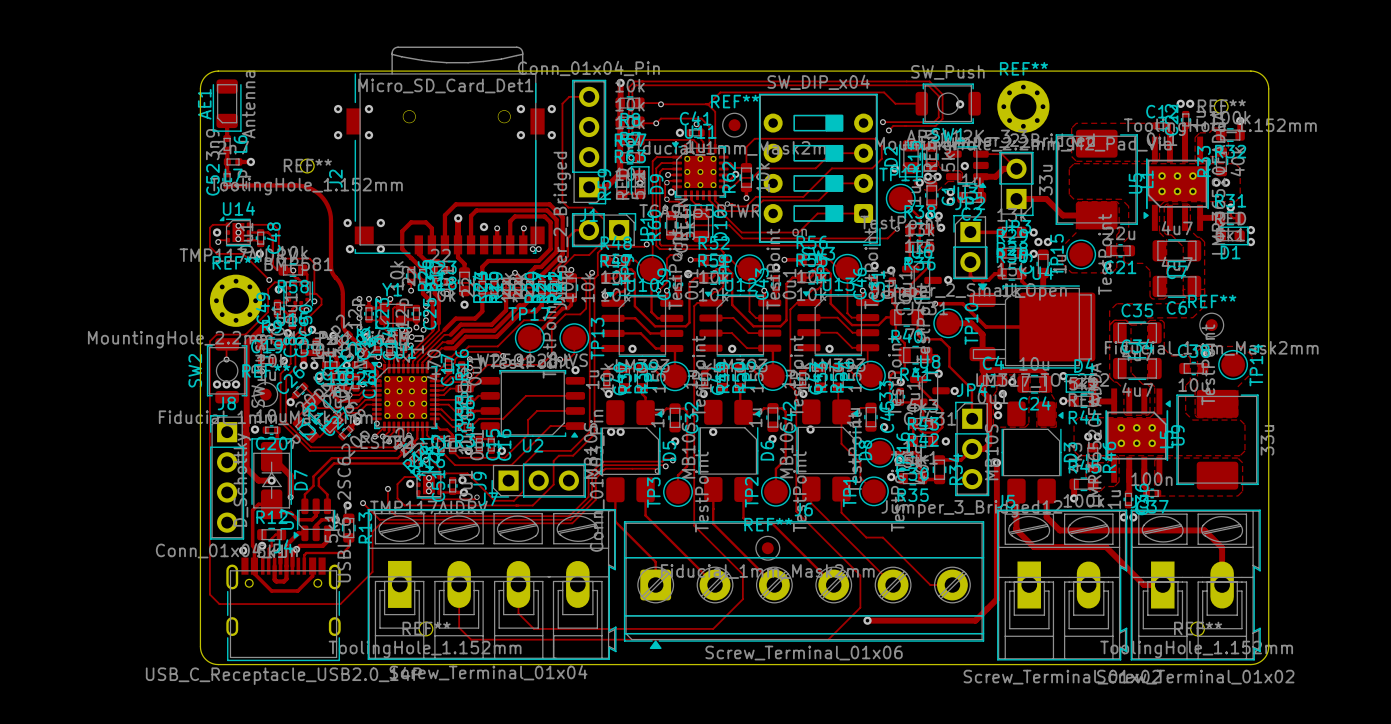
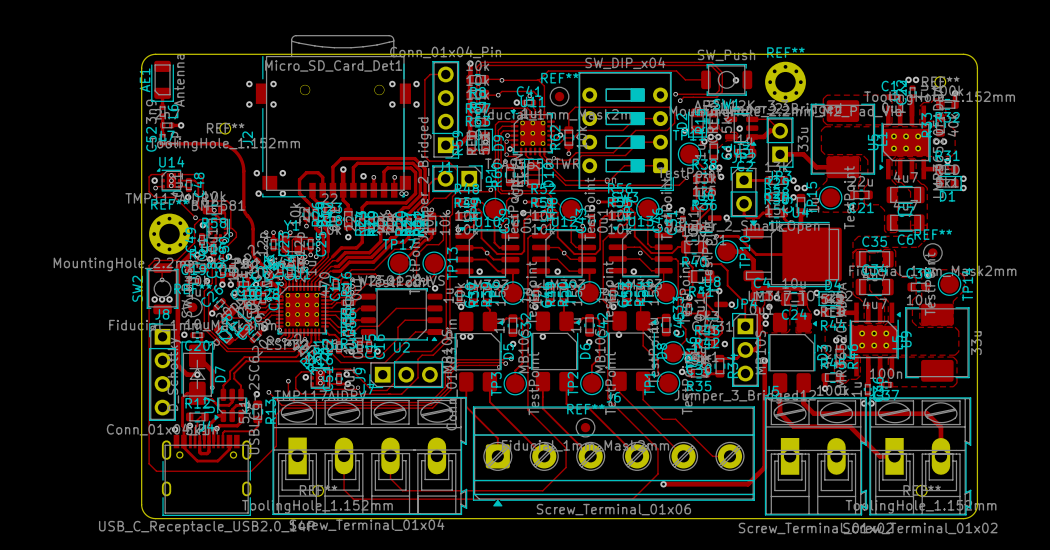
via: none -> (487, 253)
via: none -> (564, 253)
via: none -> (640, 253)
track: none -> (663, 258) (676, 258) (678, 261) (678, 321) (685, 329) (685, 340) (673, 352)

